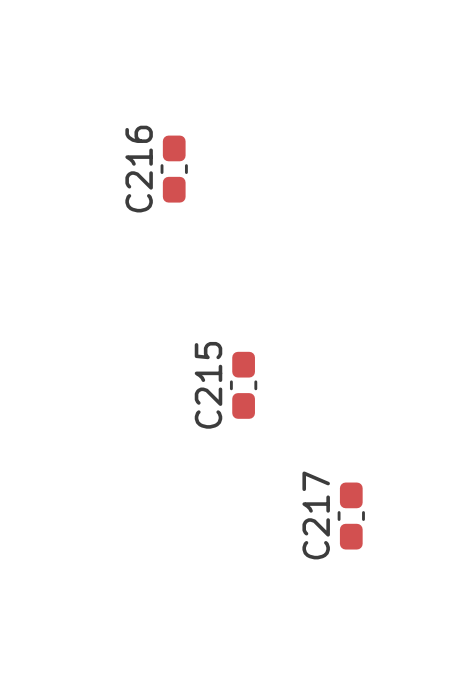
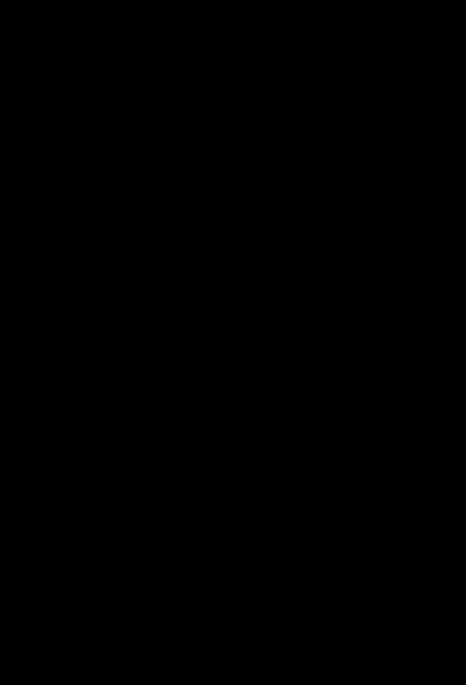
C216: (174, 169) -> none
C215: (243, 385) -> none
C217: (351, 516) -> none

